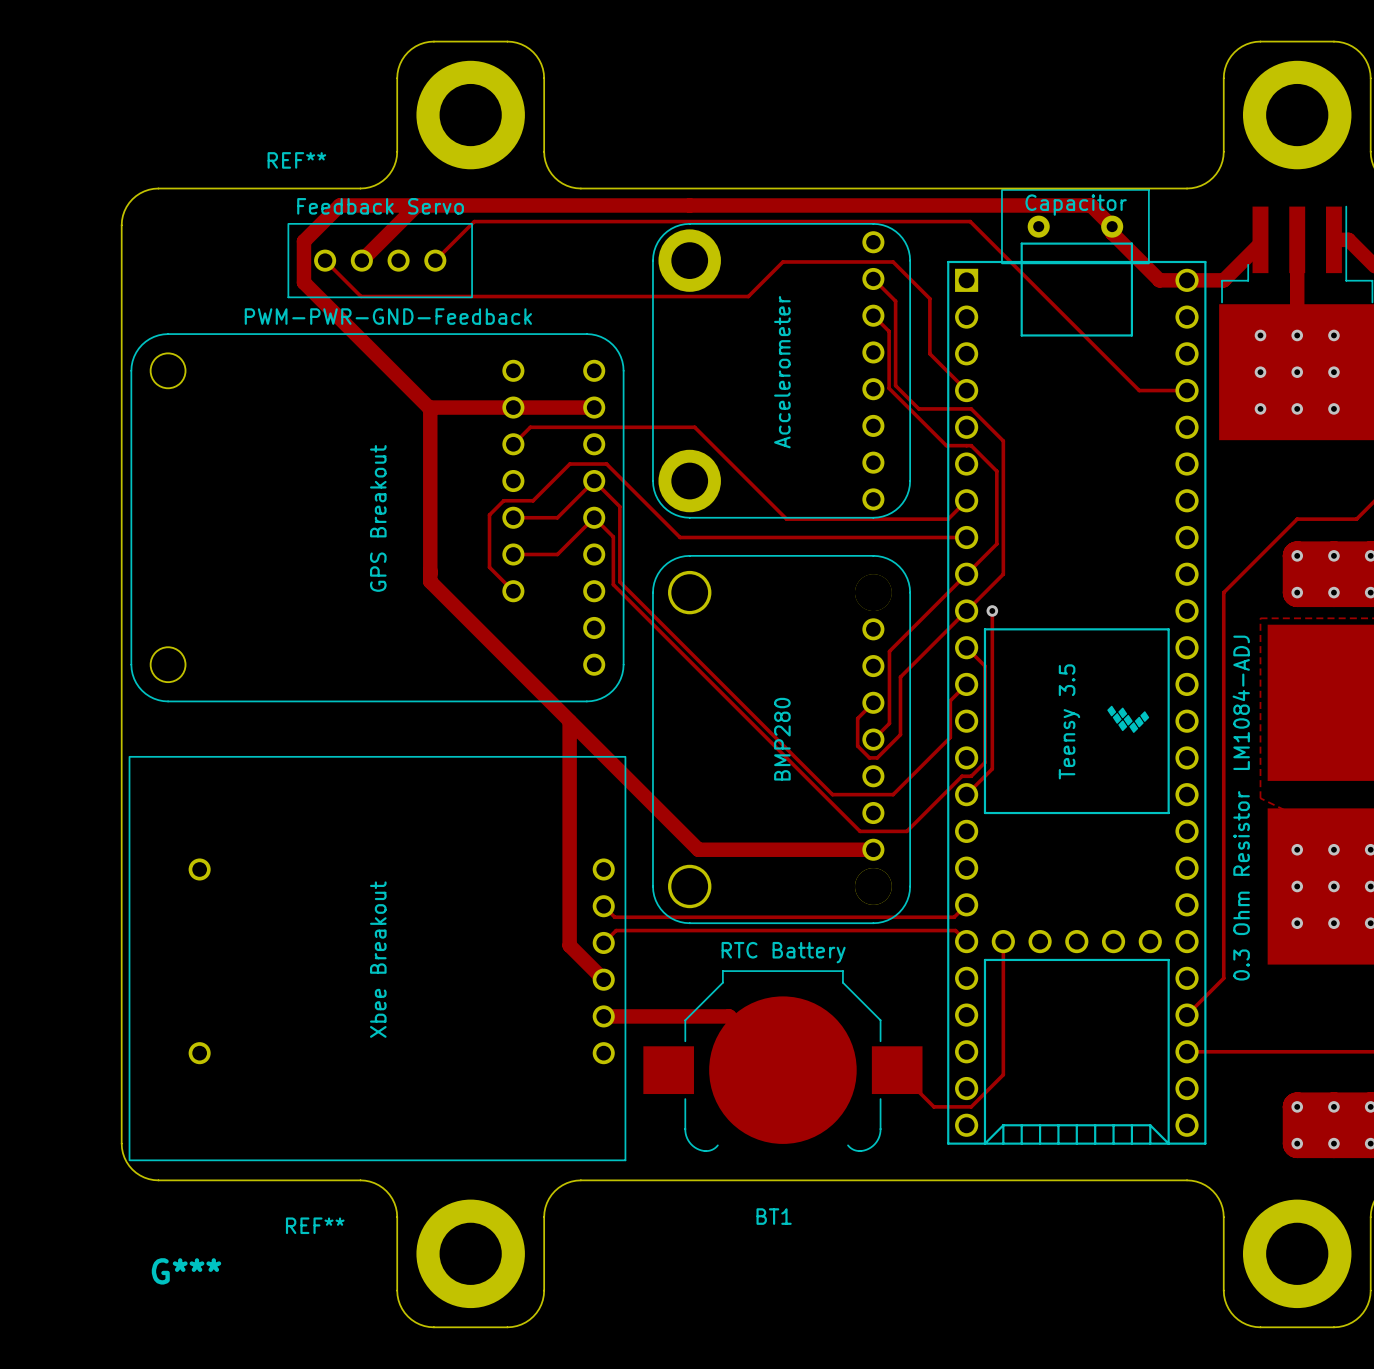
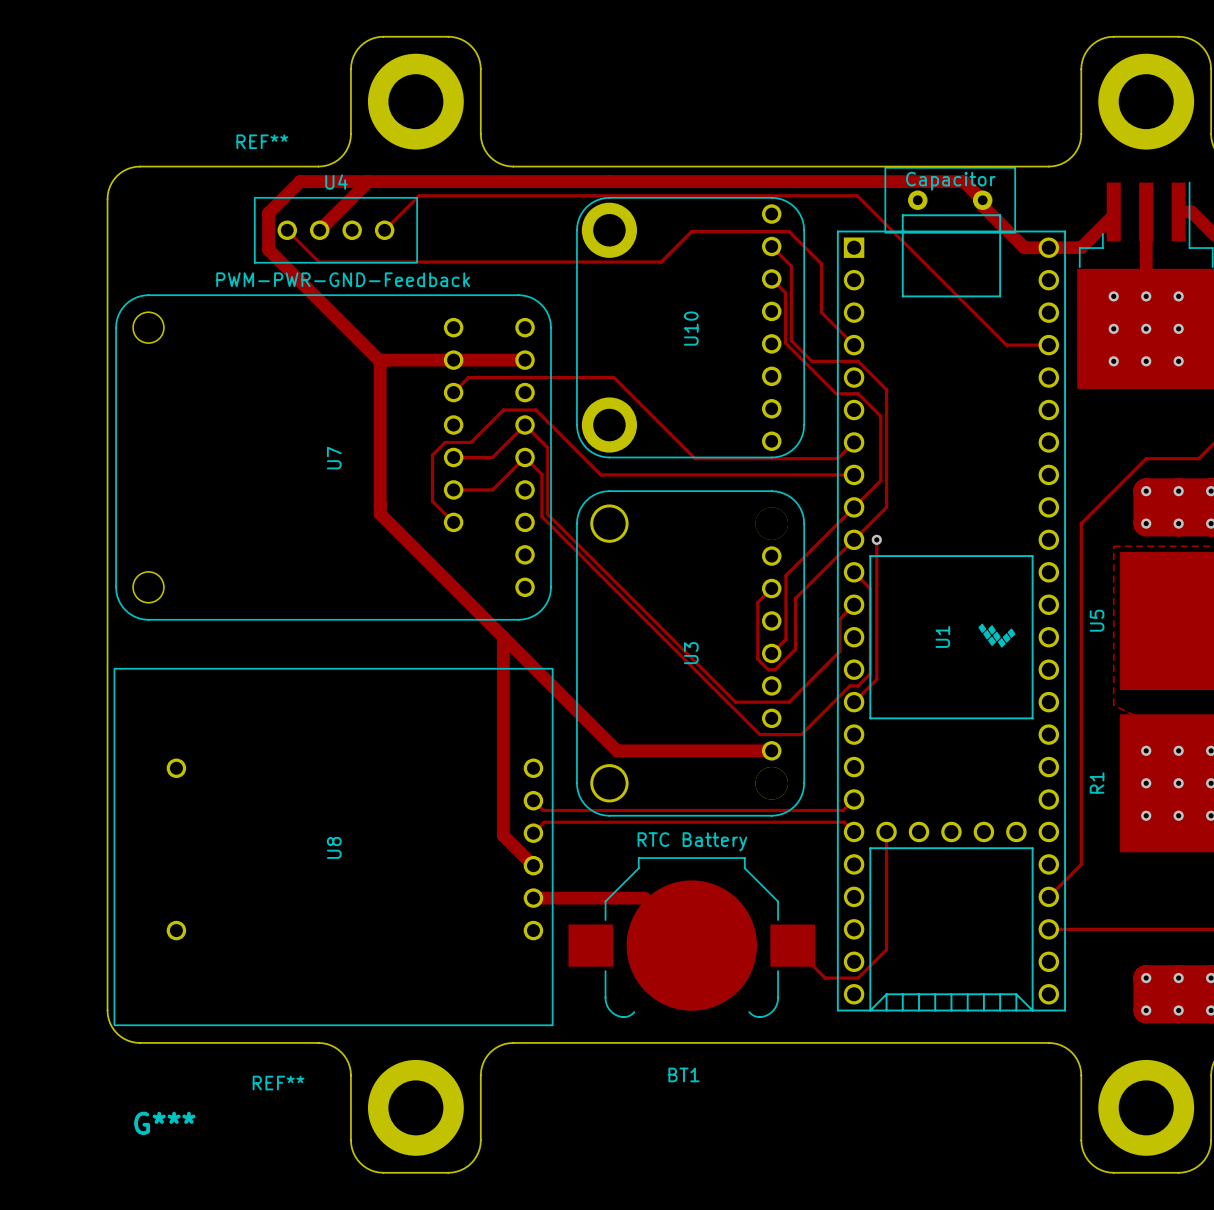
Feedback Servo name: Feedback Servo (380, 206) -> U4 (336, 182)
Accelerometer name: Accelerometer (782, 372) -> U10 (691, 328)
GPS Breakout name: GPS Breakout (378, 518) -> U7 (334, 458)
track: (873, 702) (857, 718) -> (771, 588) (757, 602) (757, 634)
LM1084-ADJ name: LM1084-ADJ (1241, 702) -> U5 (1097, 620)
Teensy 3.5 name: Teensy 3.5 (1069, 721) -> U1 (942, 636)
BMP280 name: BMP280 (782, 739) -> U3 (691, 653)
0.3 Ohm Resistor name: 0.3 Ohm Resistor (1241, 885) -> R1 (1097, 782)
Xbee Breakout name: Xbee Breakout (378, 959) -> U8 (334, 847)

